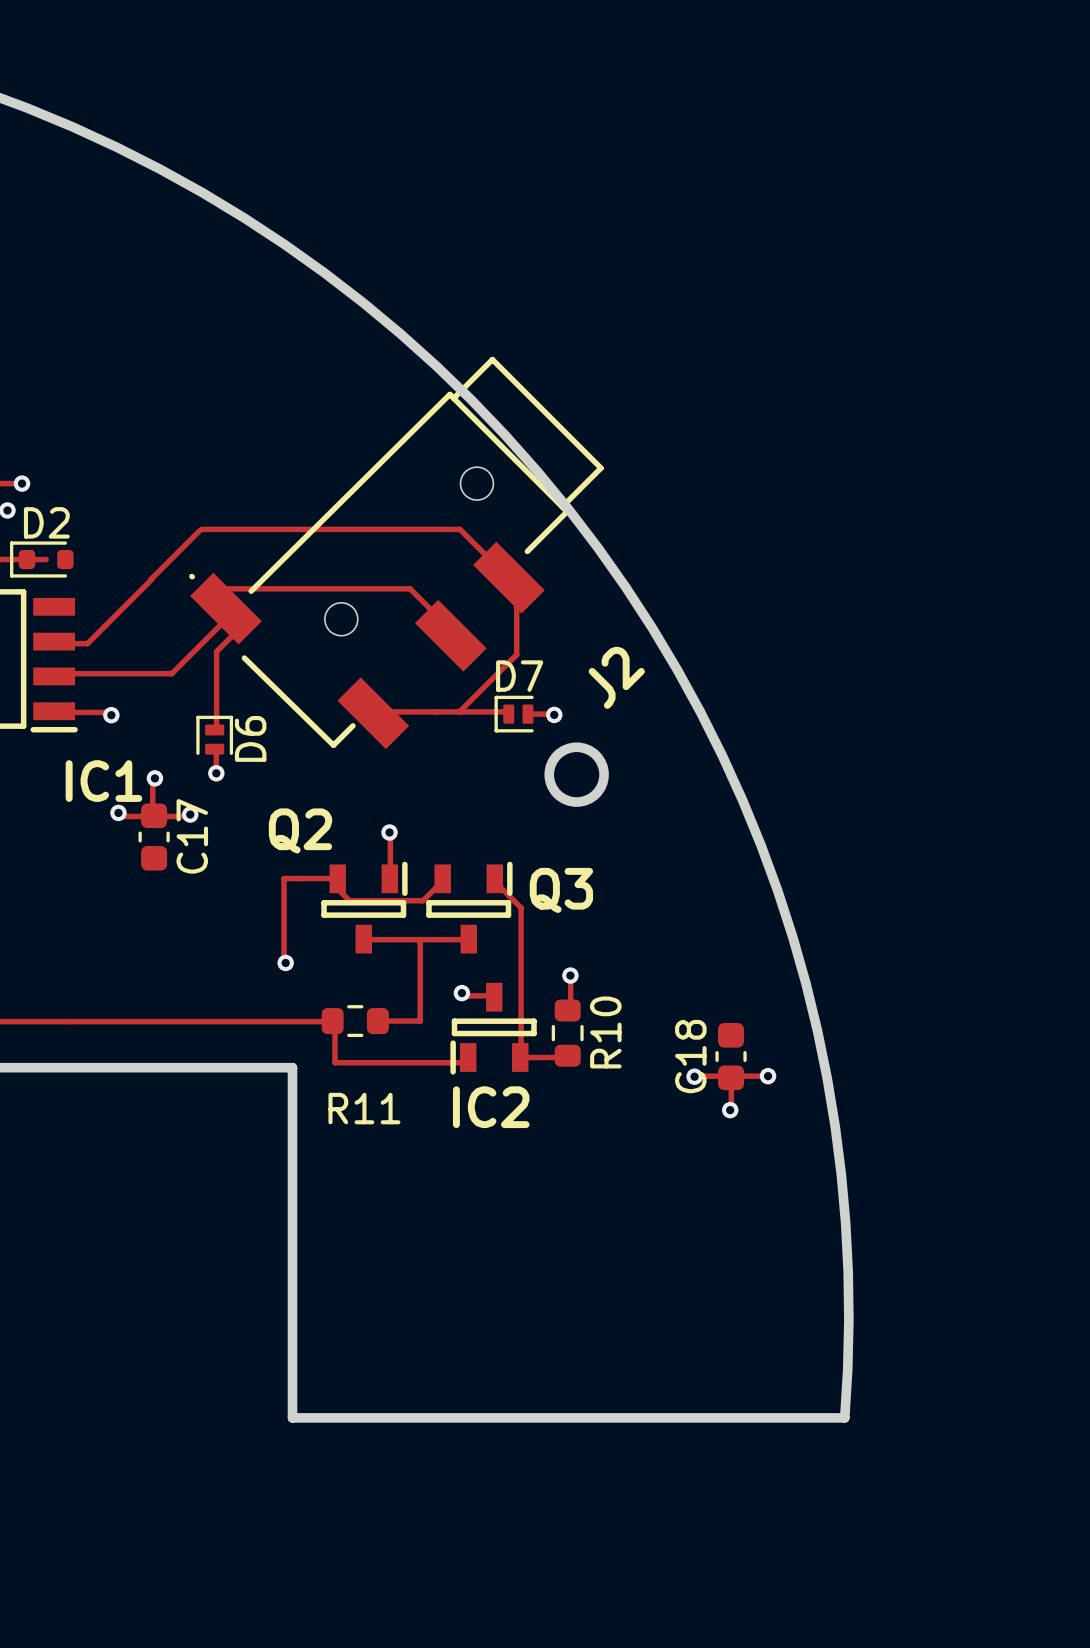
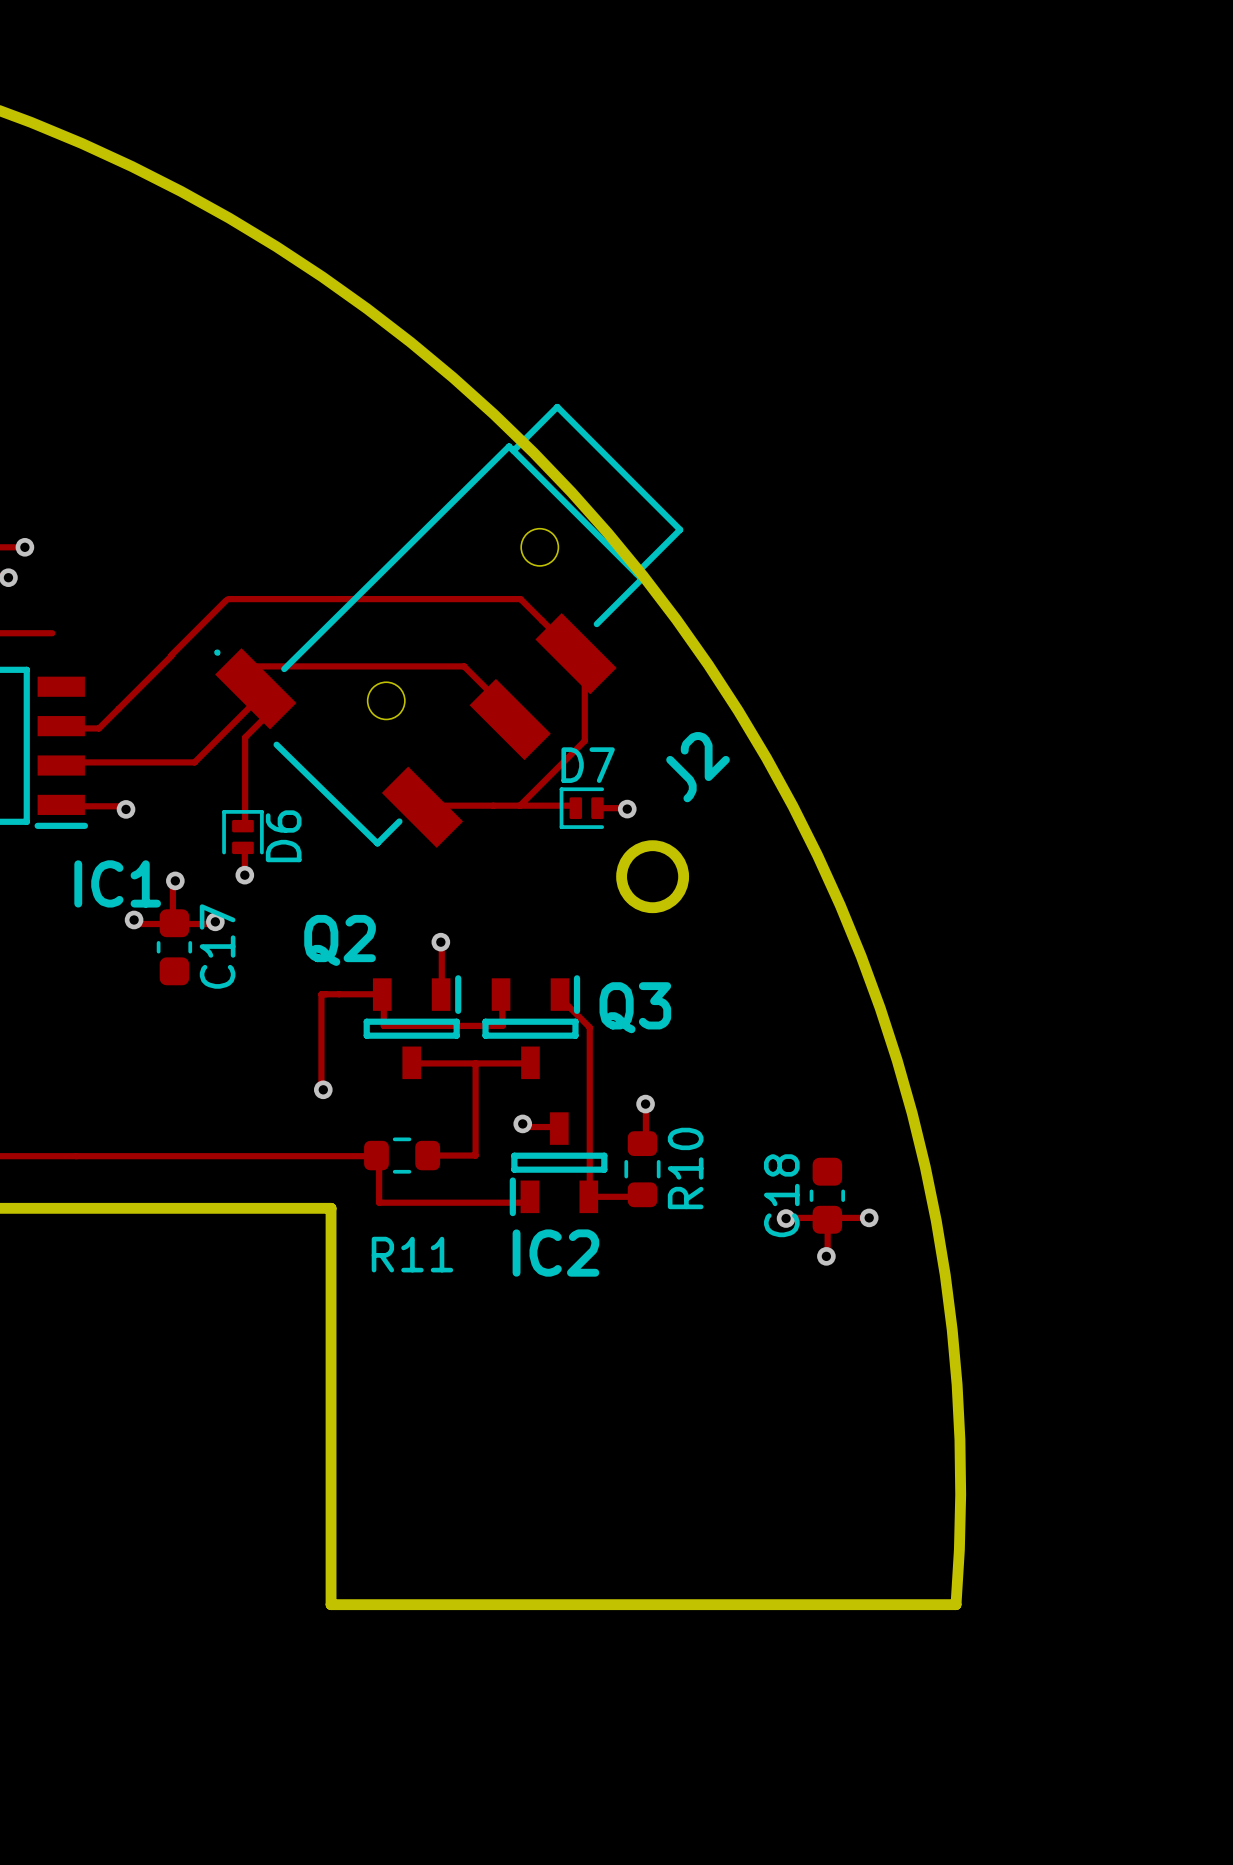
D2: (41, 559) -> none
track: (446, 877) (422, 900) (349, 900) (335, 887) -> none
track: none -> (383, 1003) (383, 1025) (502, 1025) (502, 1006)

